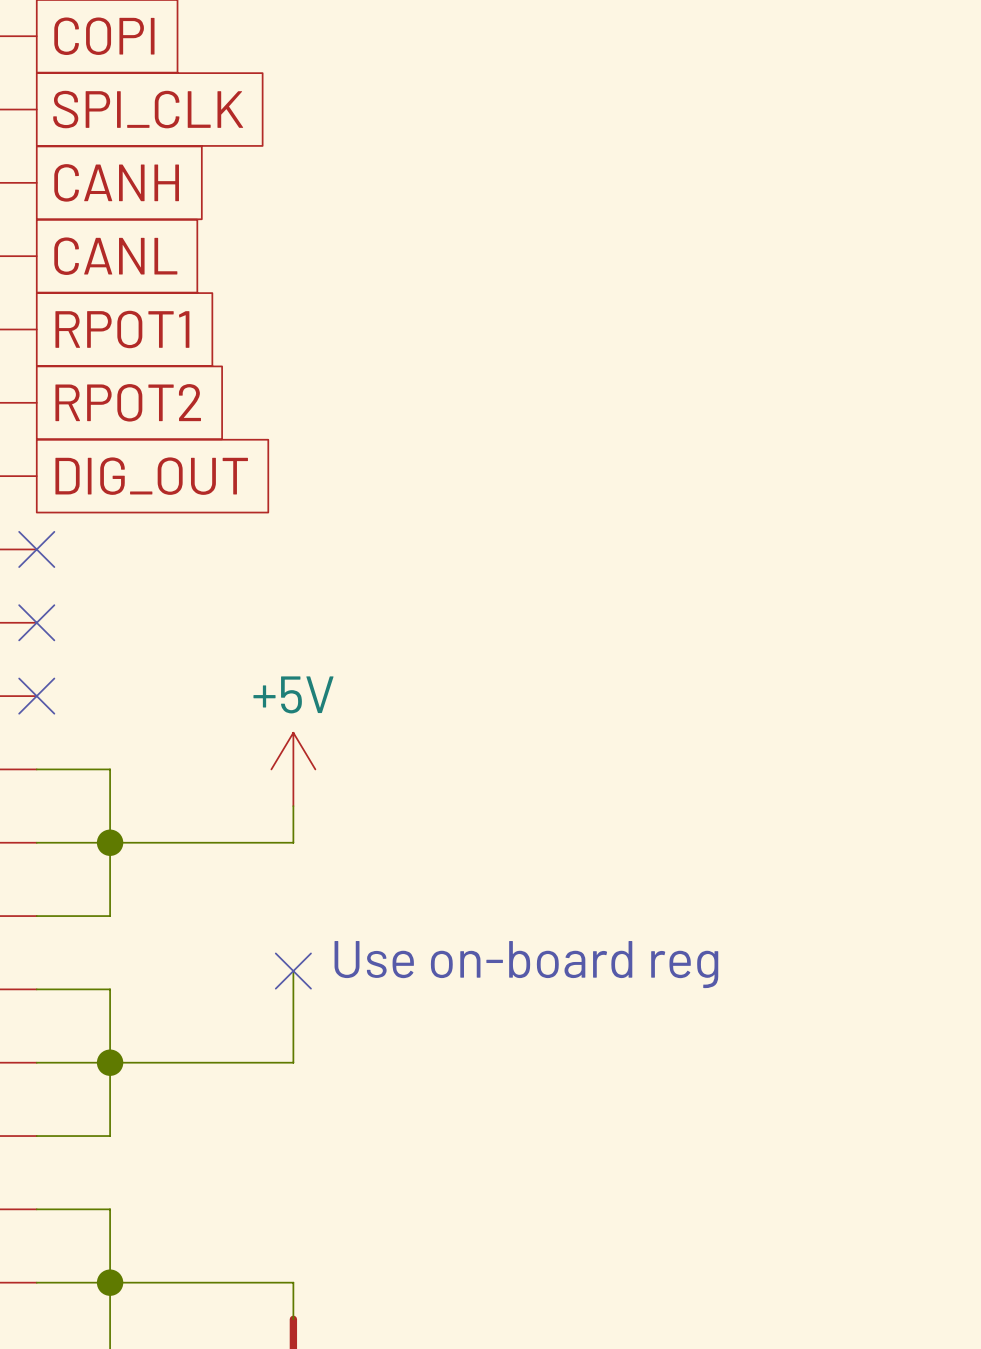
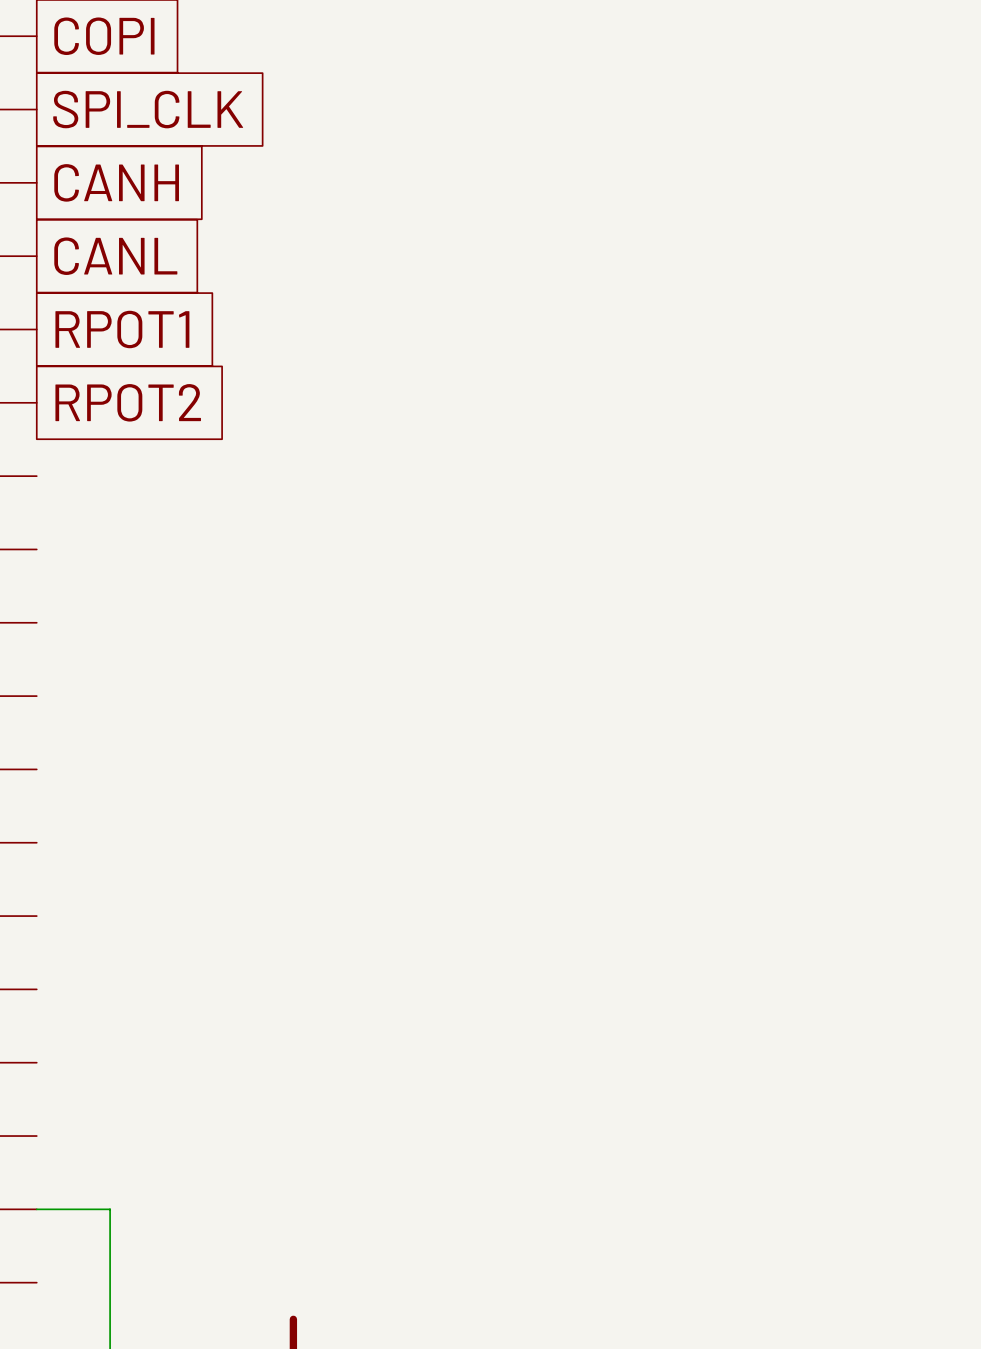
global label: DIG_OUT (151, 476) -> none
no-connect mark: (36, 549) -> none
no-connect mark: (36, 622) -> none
no-connect mark: (36, 696) -> none
wire: (36, 769) (110, 769) (110, 916) (36, 916) -> none
power symbol: +5V (293, 769) -> none
wire: (293, 806) (293, 842) (36, 842) -> none
junction: (110, 842) -> none
text: Use on-board reg (526, 964) -> none
wire: (293, 971) (293, 1062) (36, 1062) -> none
no-connect mark: (293, 971) -> none
wire: (36, 989) (110, 989) (110, 1136) (36, 1136) -> none
junction: (110, 1062) -> none
wire: (36, 1282) (293, 1282) (293, 1319) -> none
junction: (110, 1282) -> none

